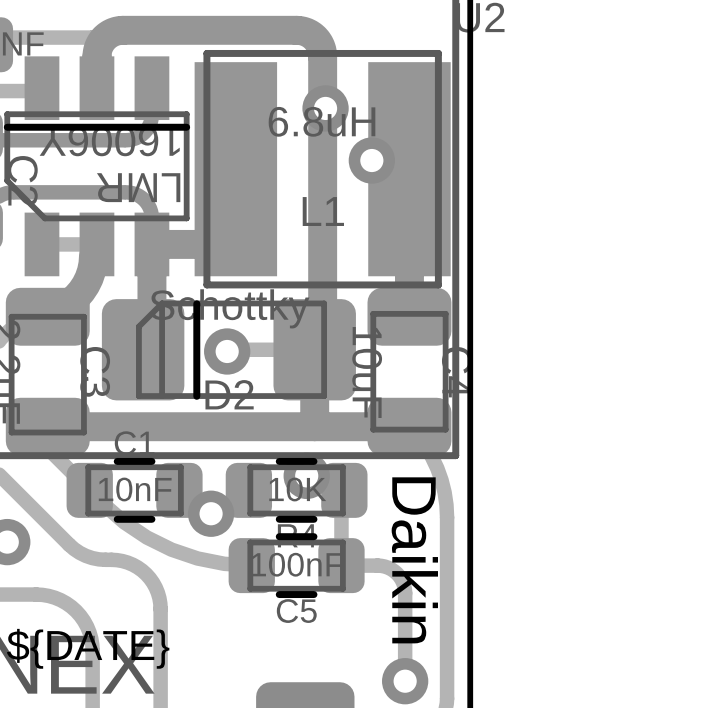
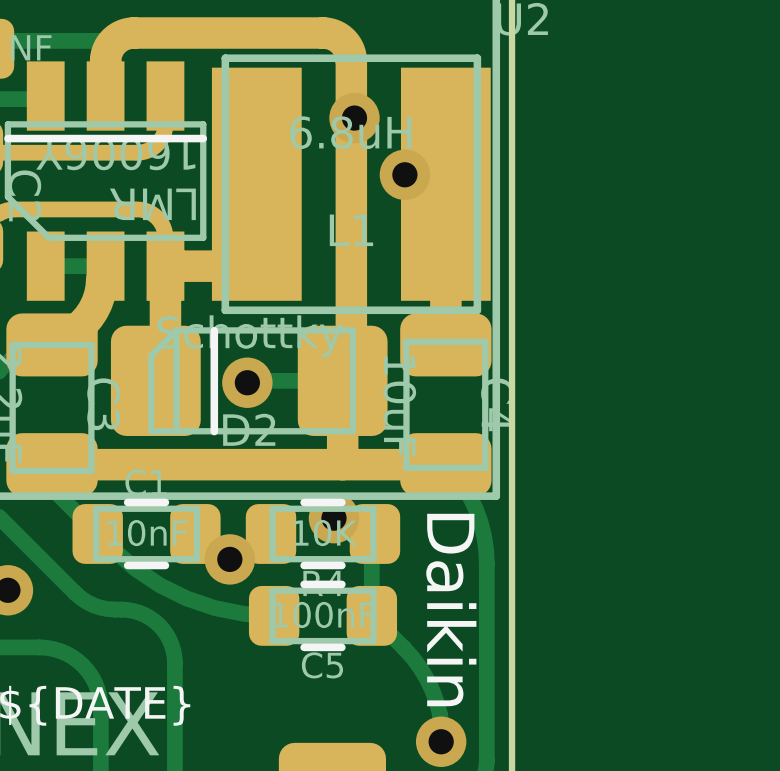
track: (341, 565) (384, 566) (394, 571) (401, 579) (405, 593) (405, 681) -> (371, 615) (412, 657) (427, 679) (440, 715) (440, 740)

